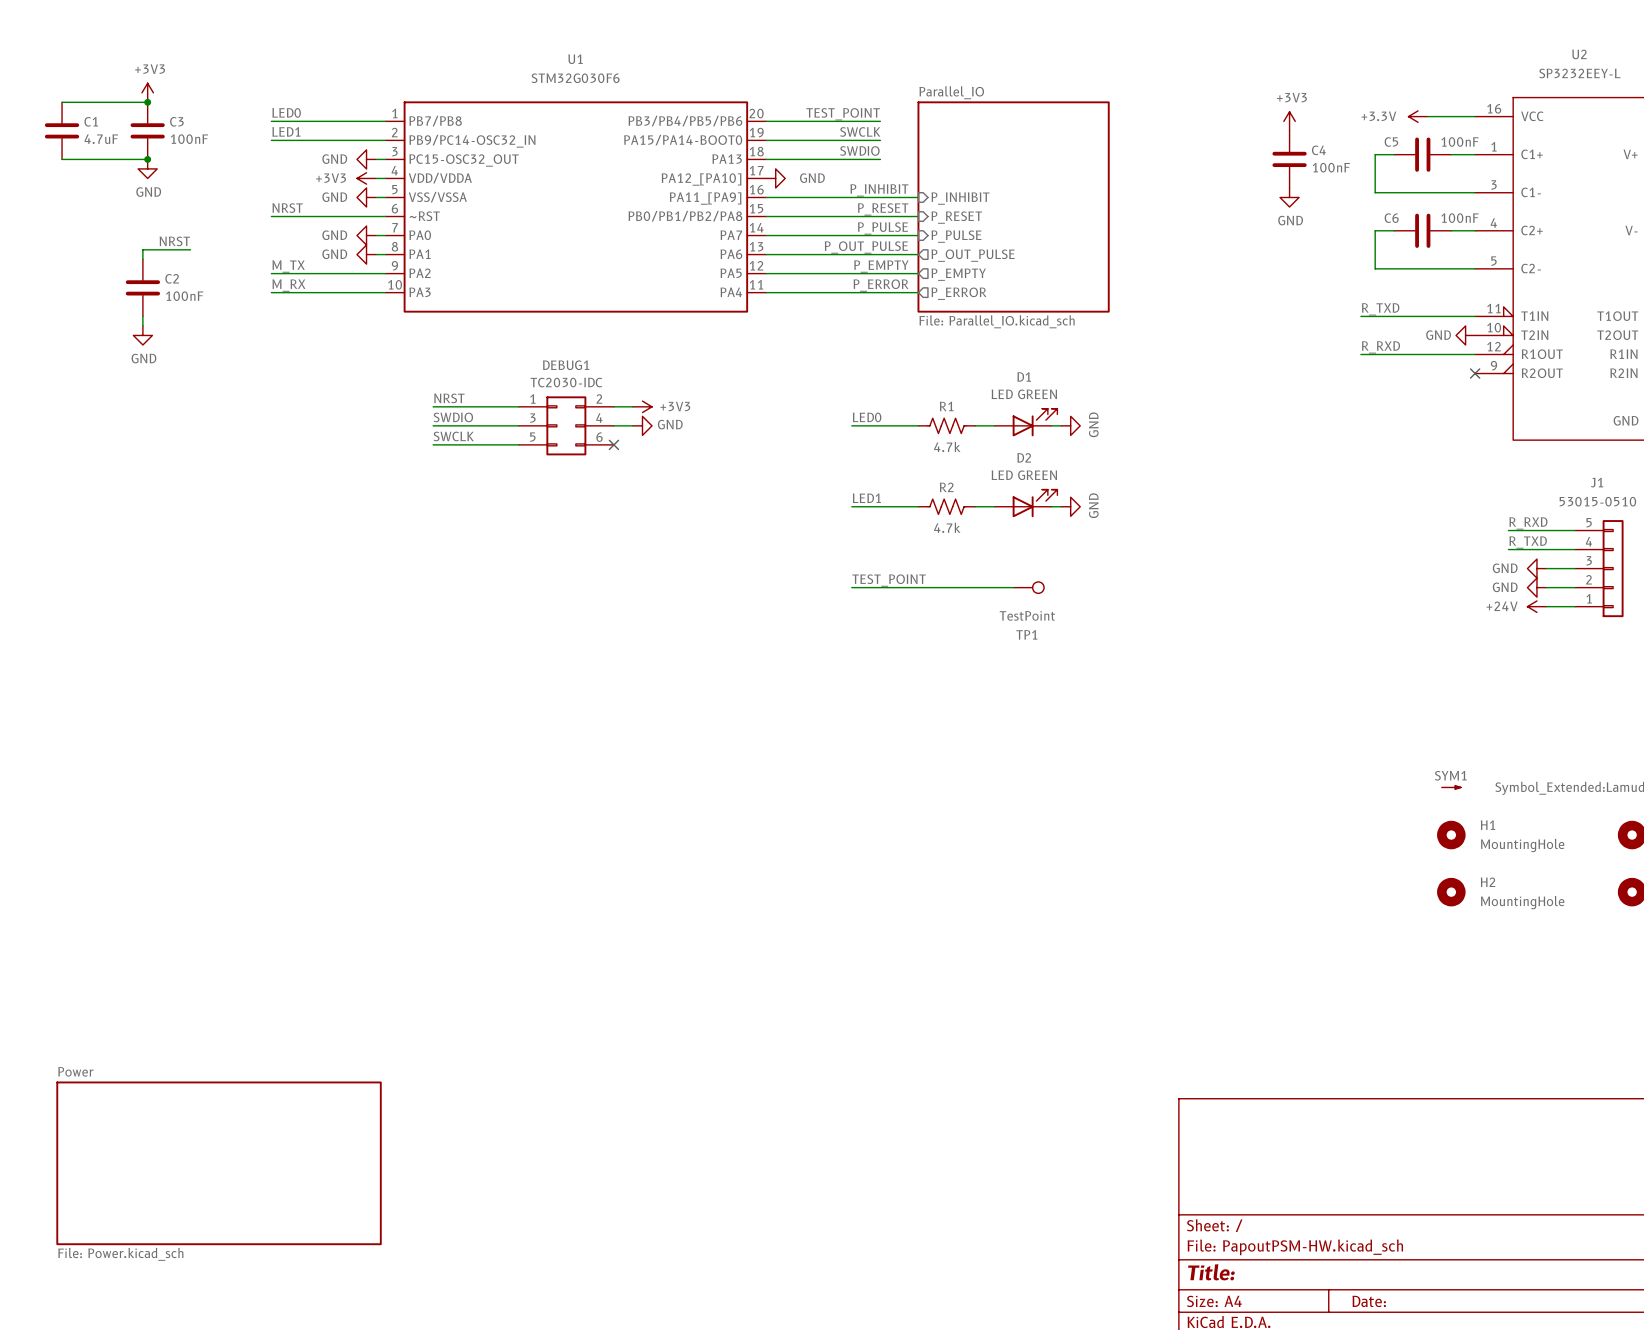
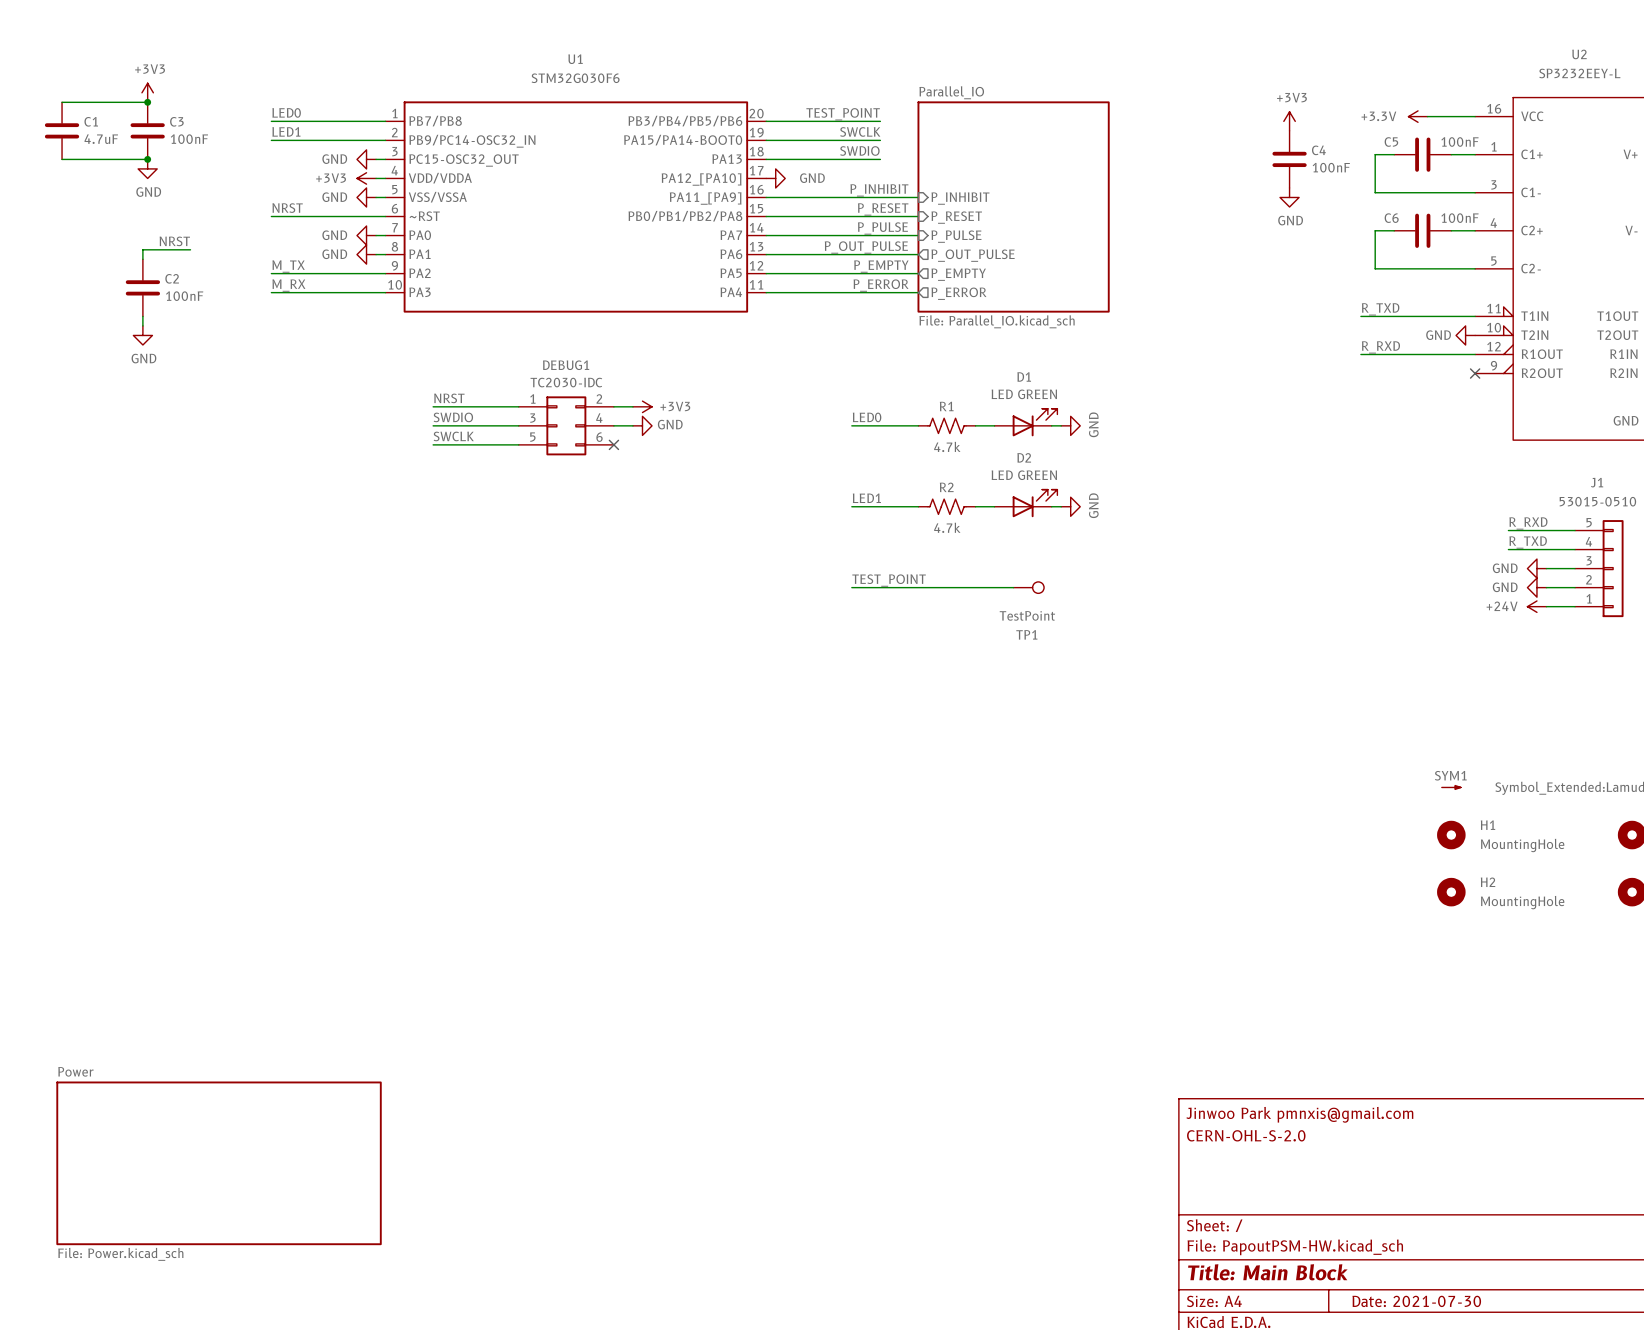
title block: none -> Jinwoo Park pmnxis@gmail.com (1299, 1114)
title block: none -> CERN-OHL-S-2.0 (1246, 1135)
title block: Title: (1211, 1272) -> Title: Main Block (1267, 1272)
title block: Date: (1369, 1301) -> Date: 2021-07-30 (1416, 1301)

